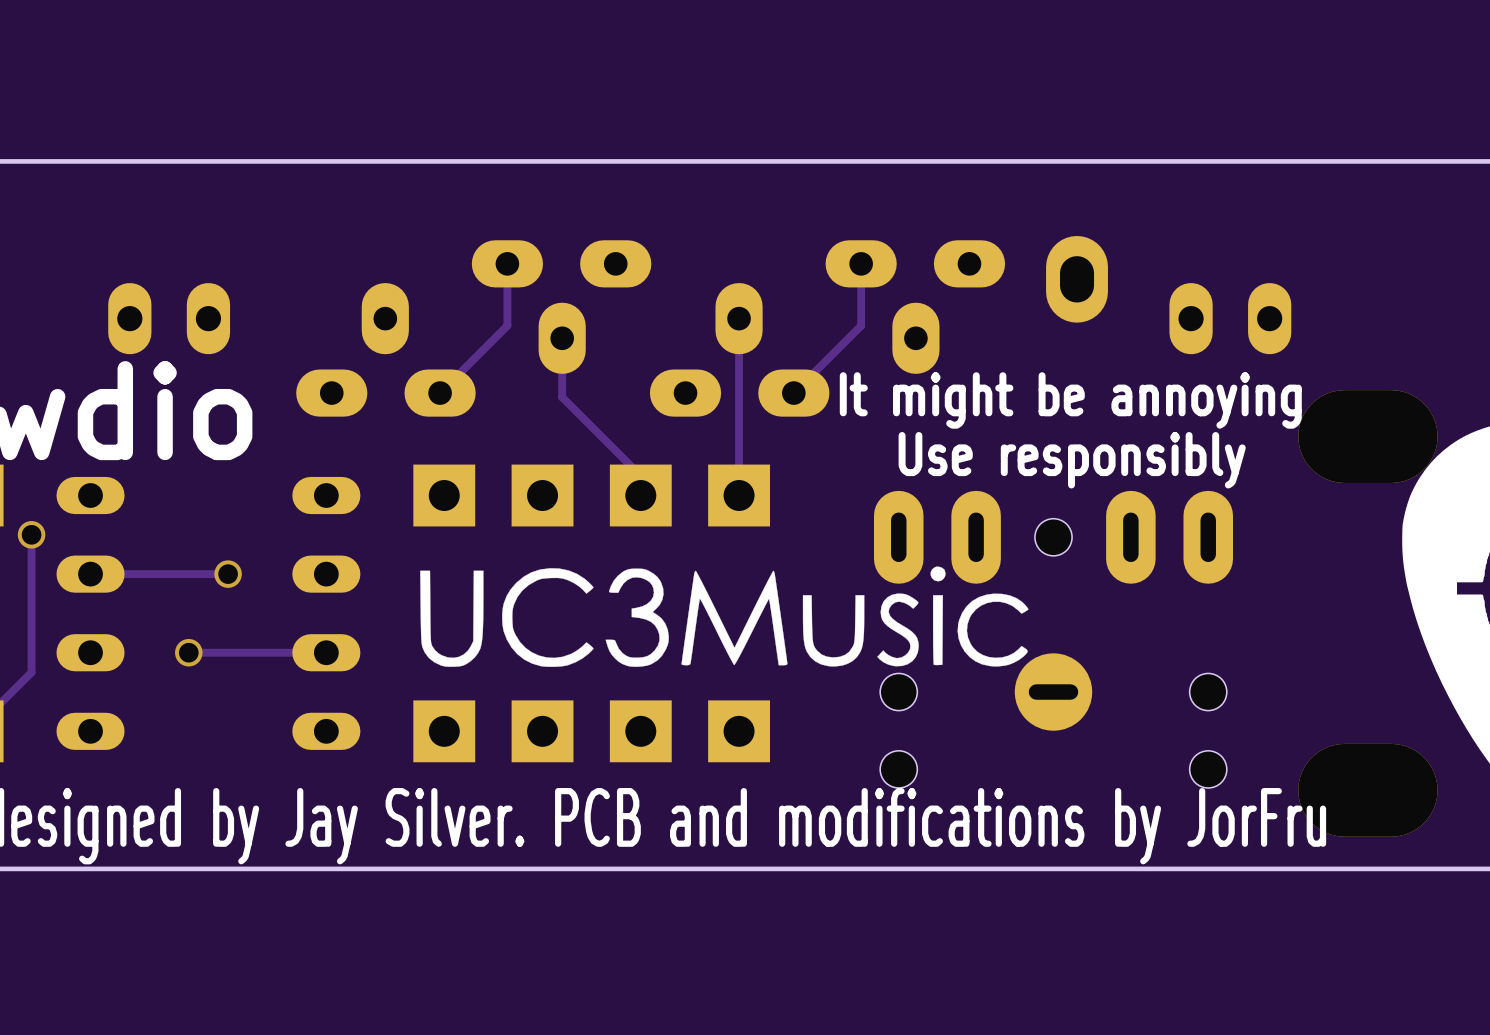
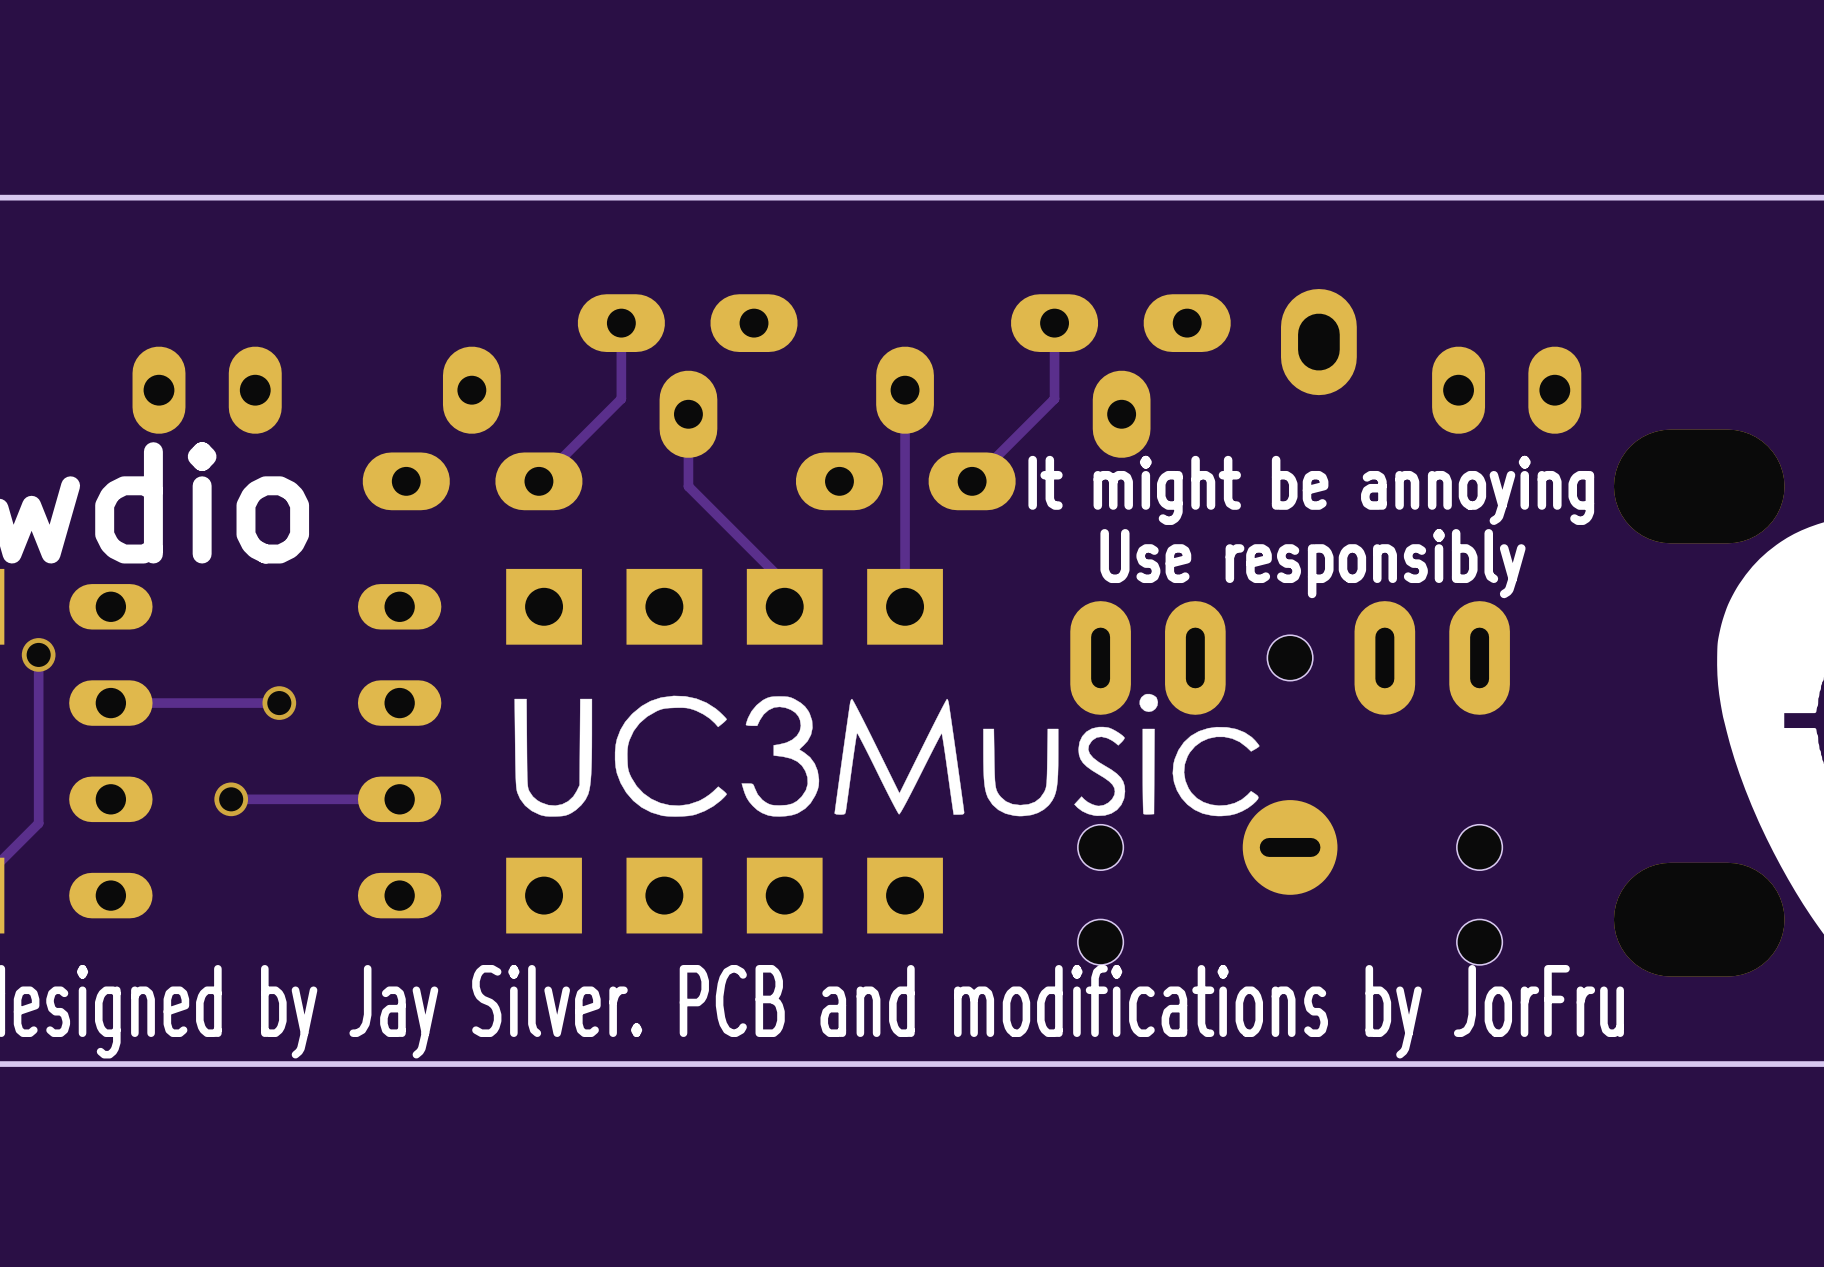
part position: (1367, 436) -> (1699, 486)
part position: (1367, 790) -> (1699, 919)

